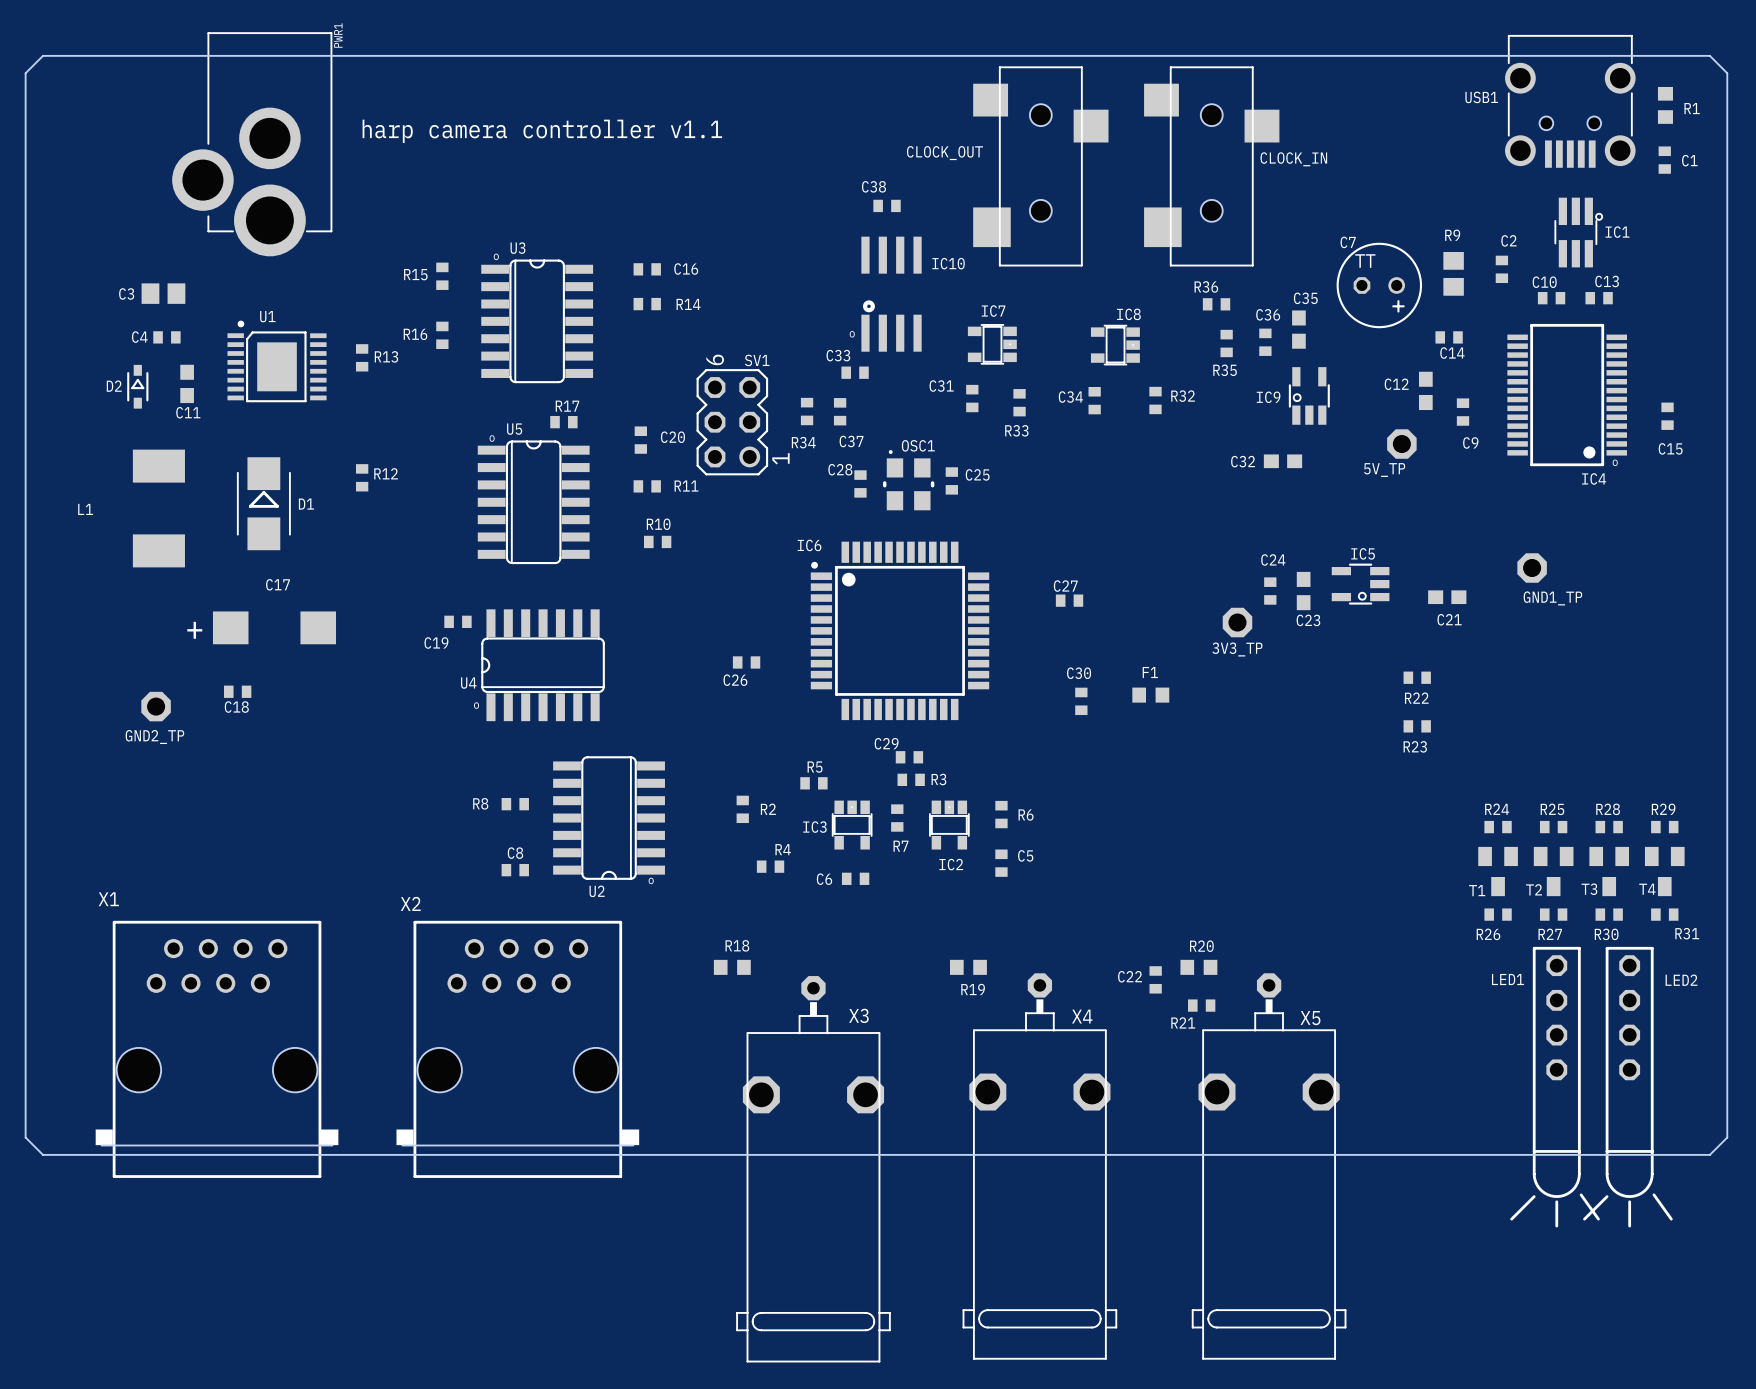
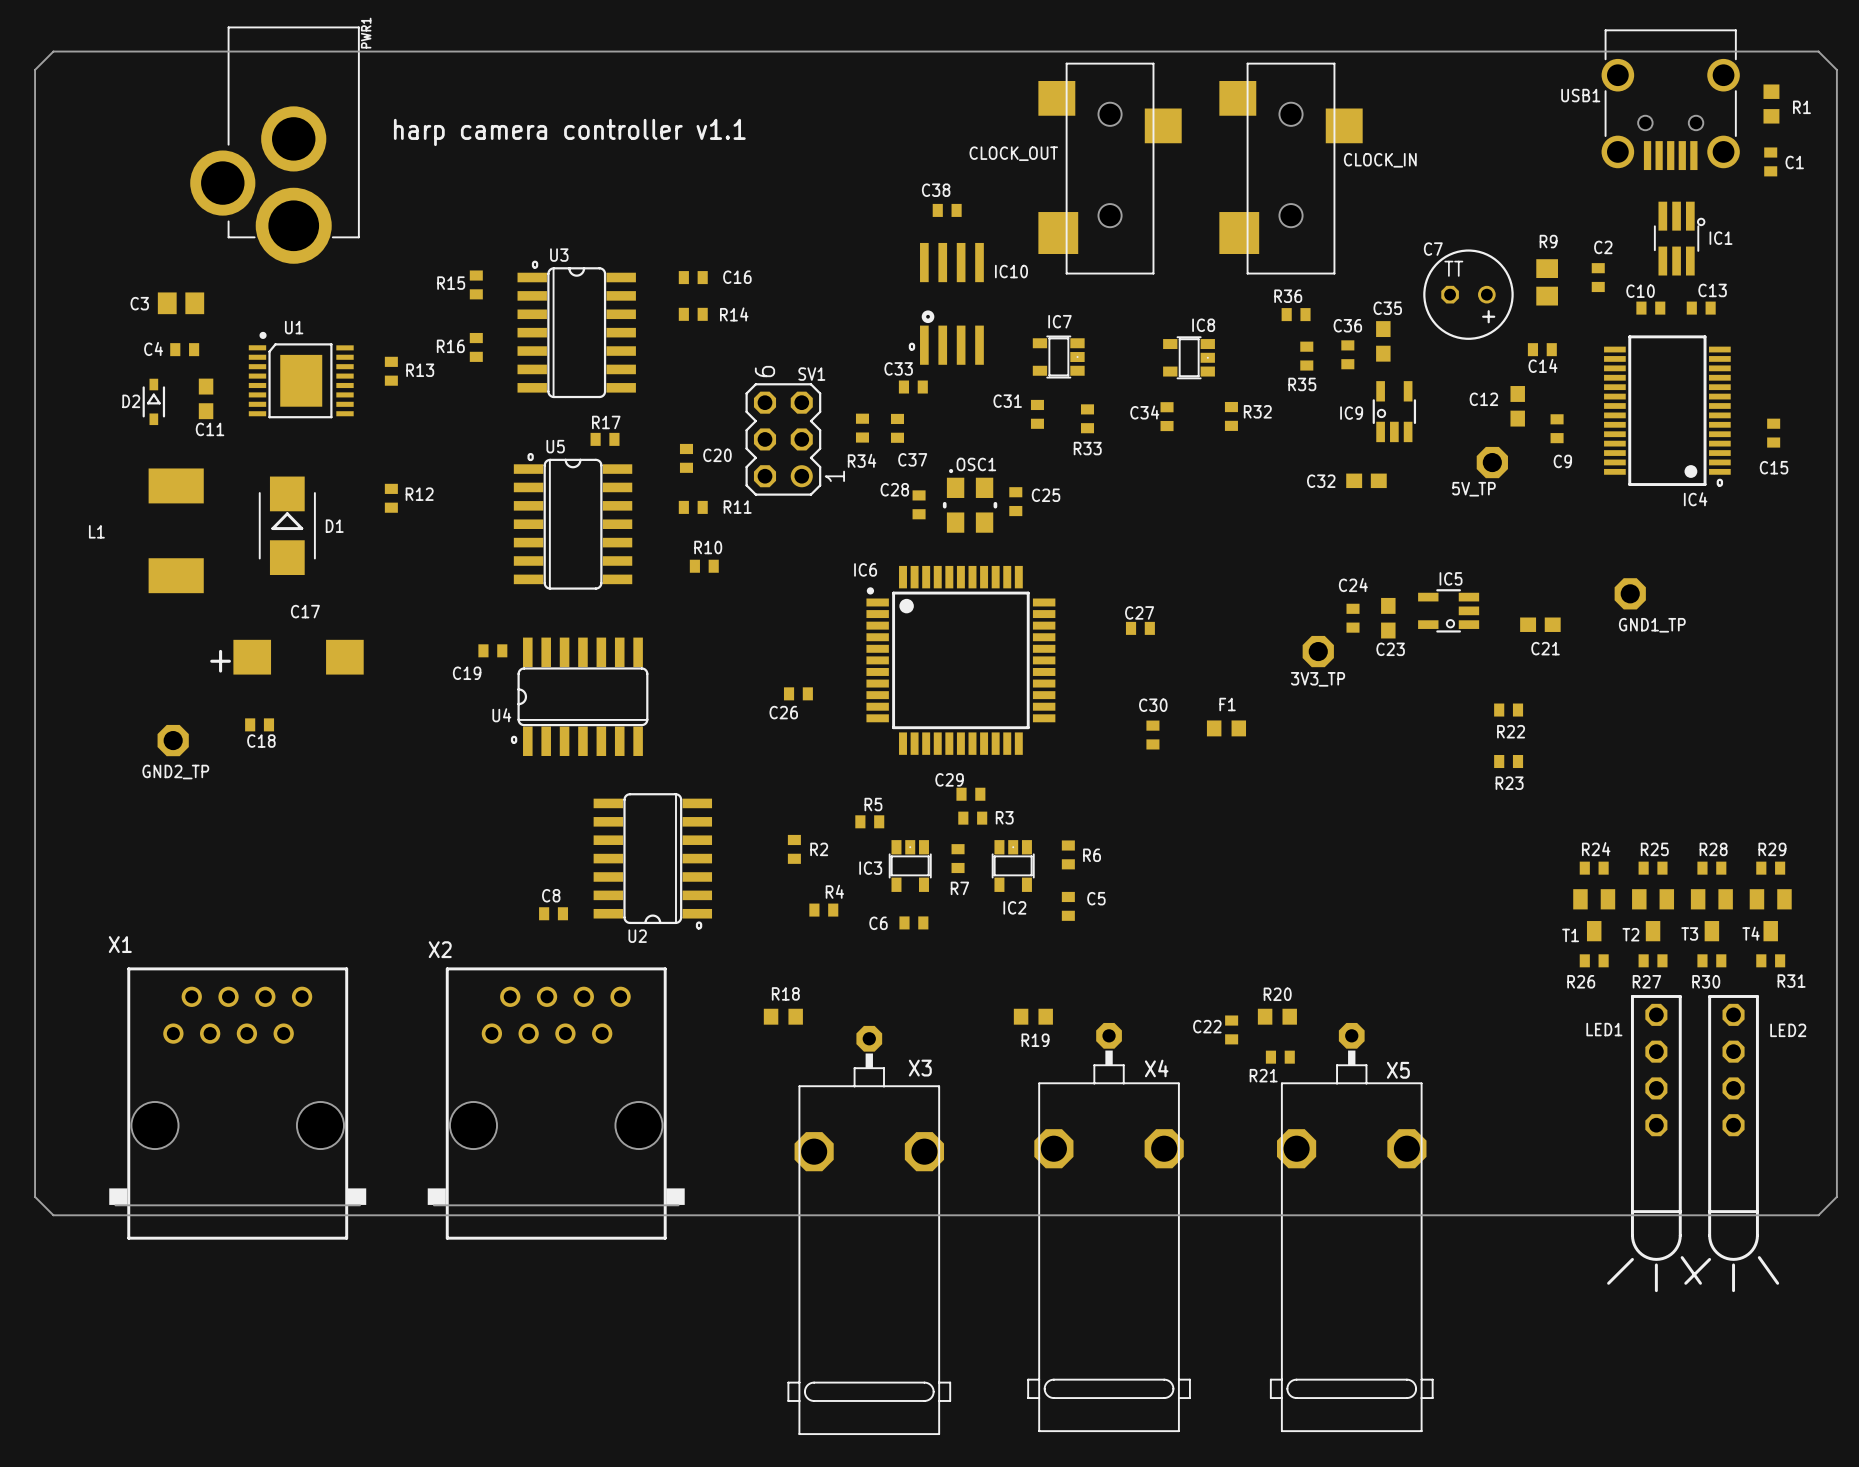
R8: (515, 804) -> none

